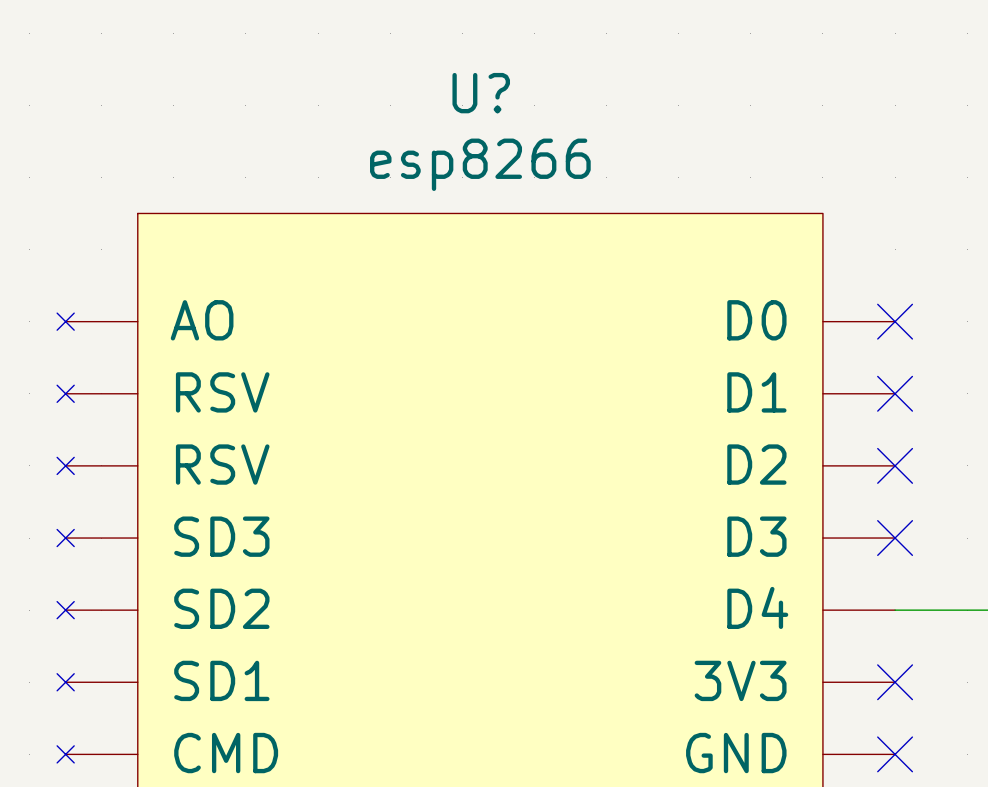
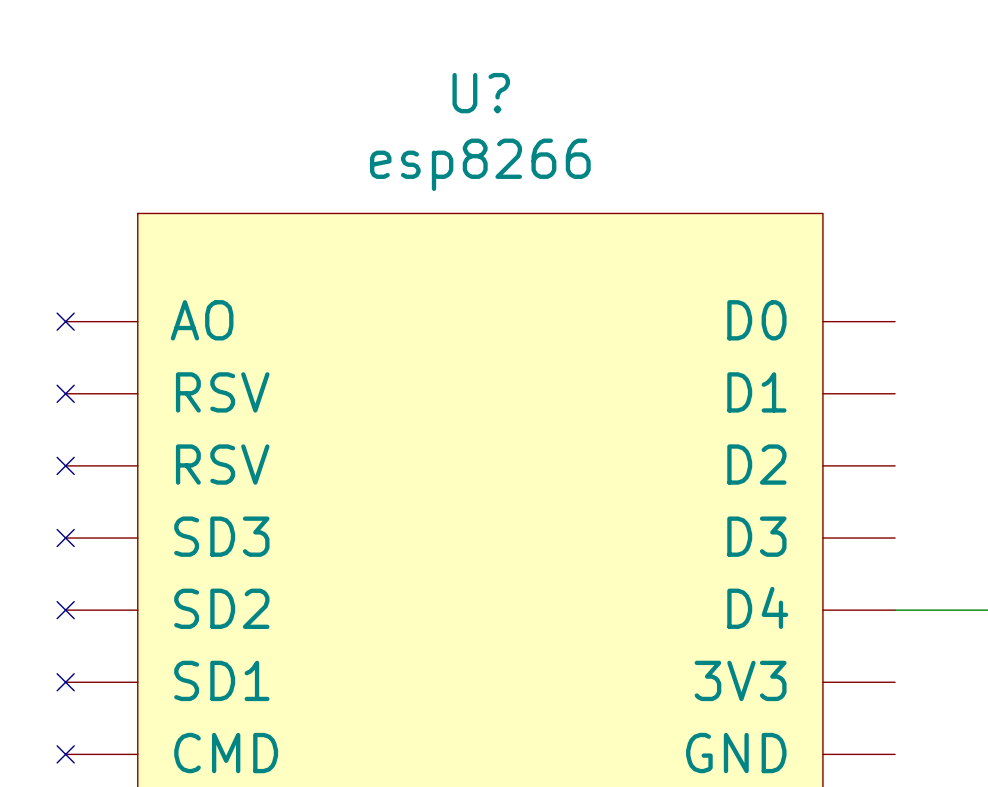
no-connect mark: (895, 321) -> none
no-connect mark: (895, 393) -> none
no-connect mark: (895, 465) -> none
no-connect mark: (895, 538) -> none
no-connect mark: (895, 682) -> none
no-connect mark: (895, 754) -> none

